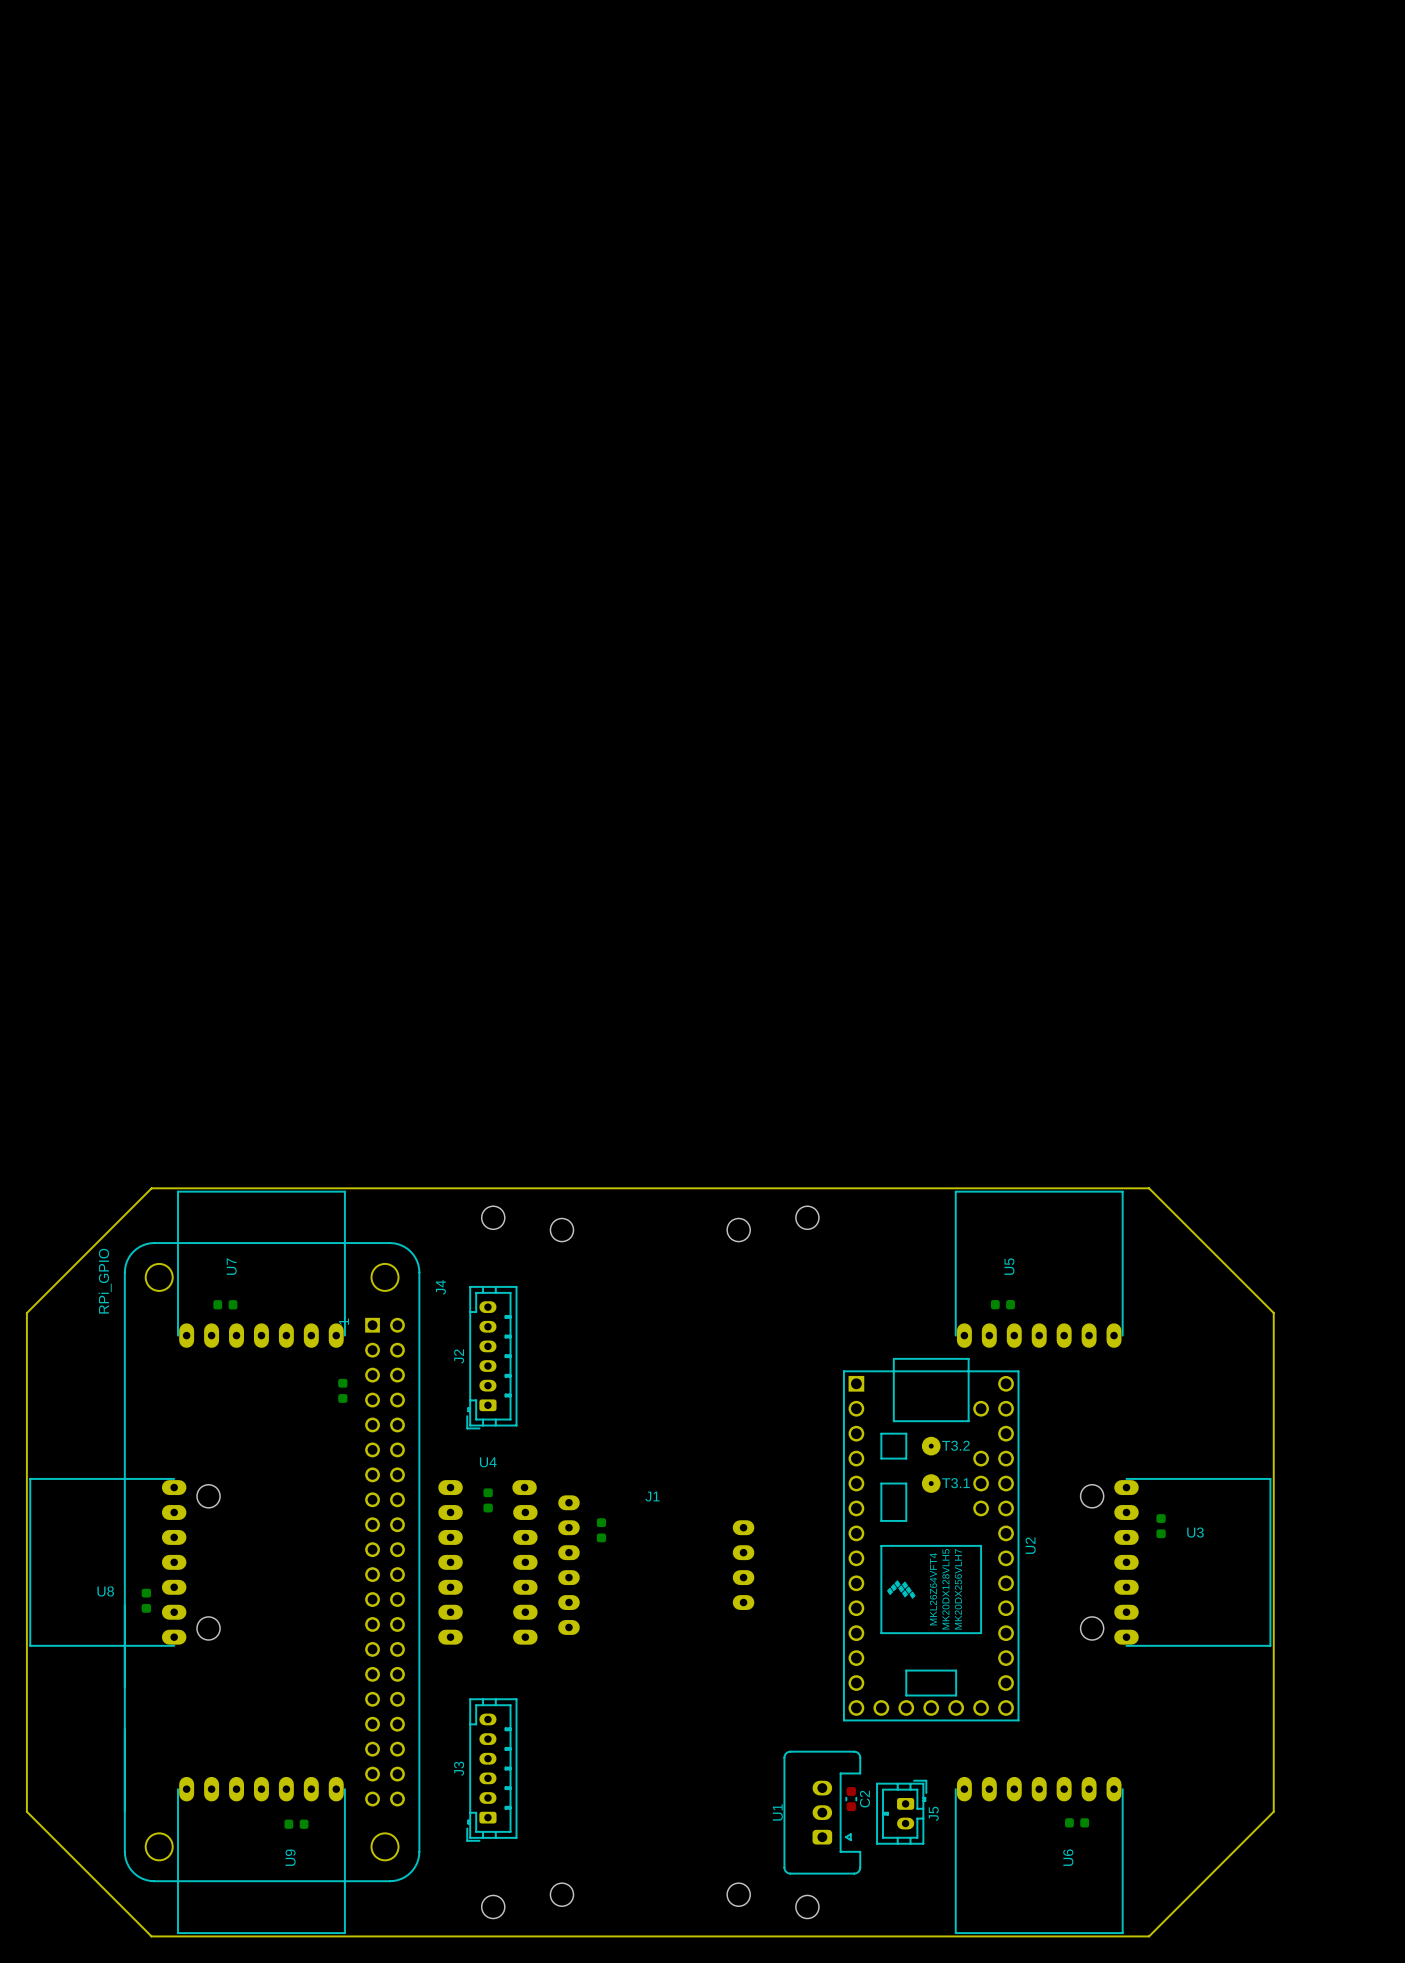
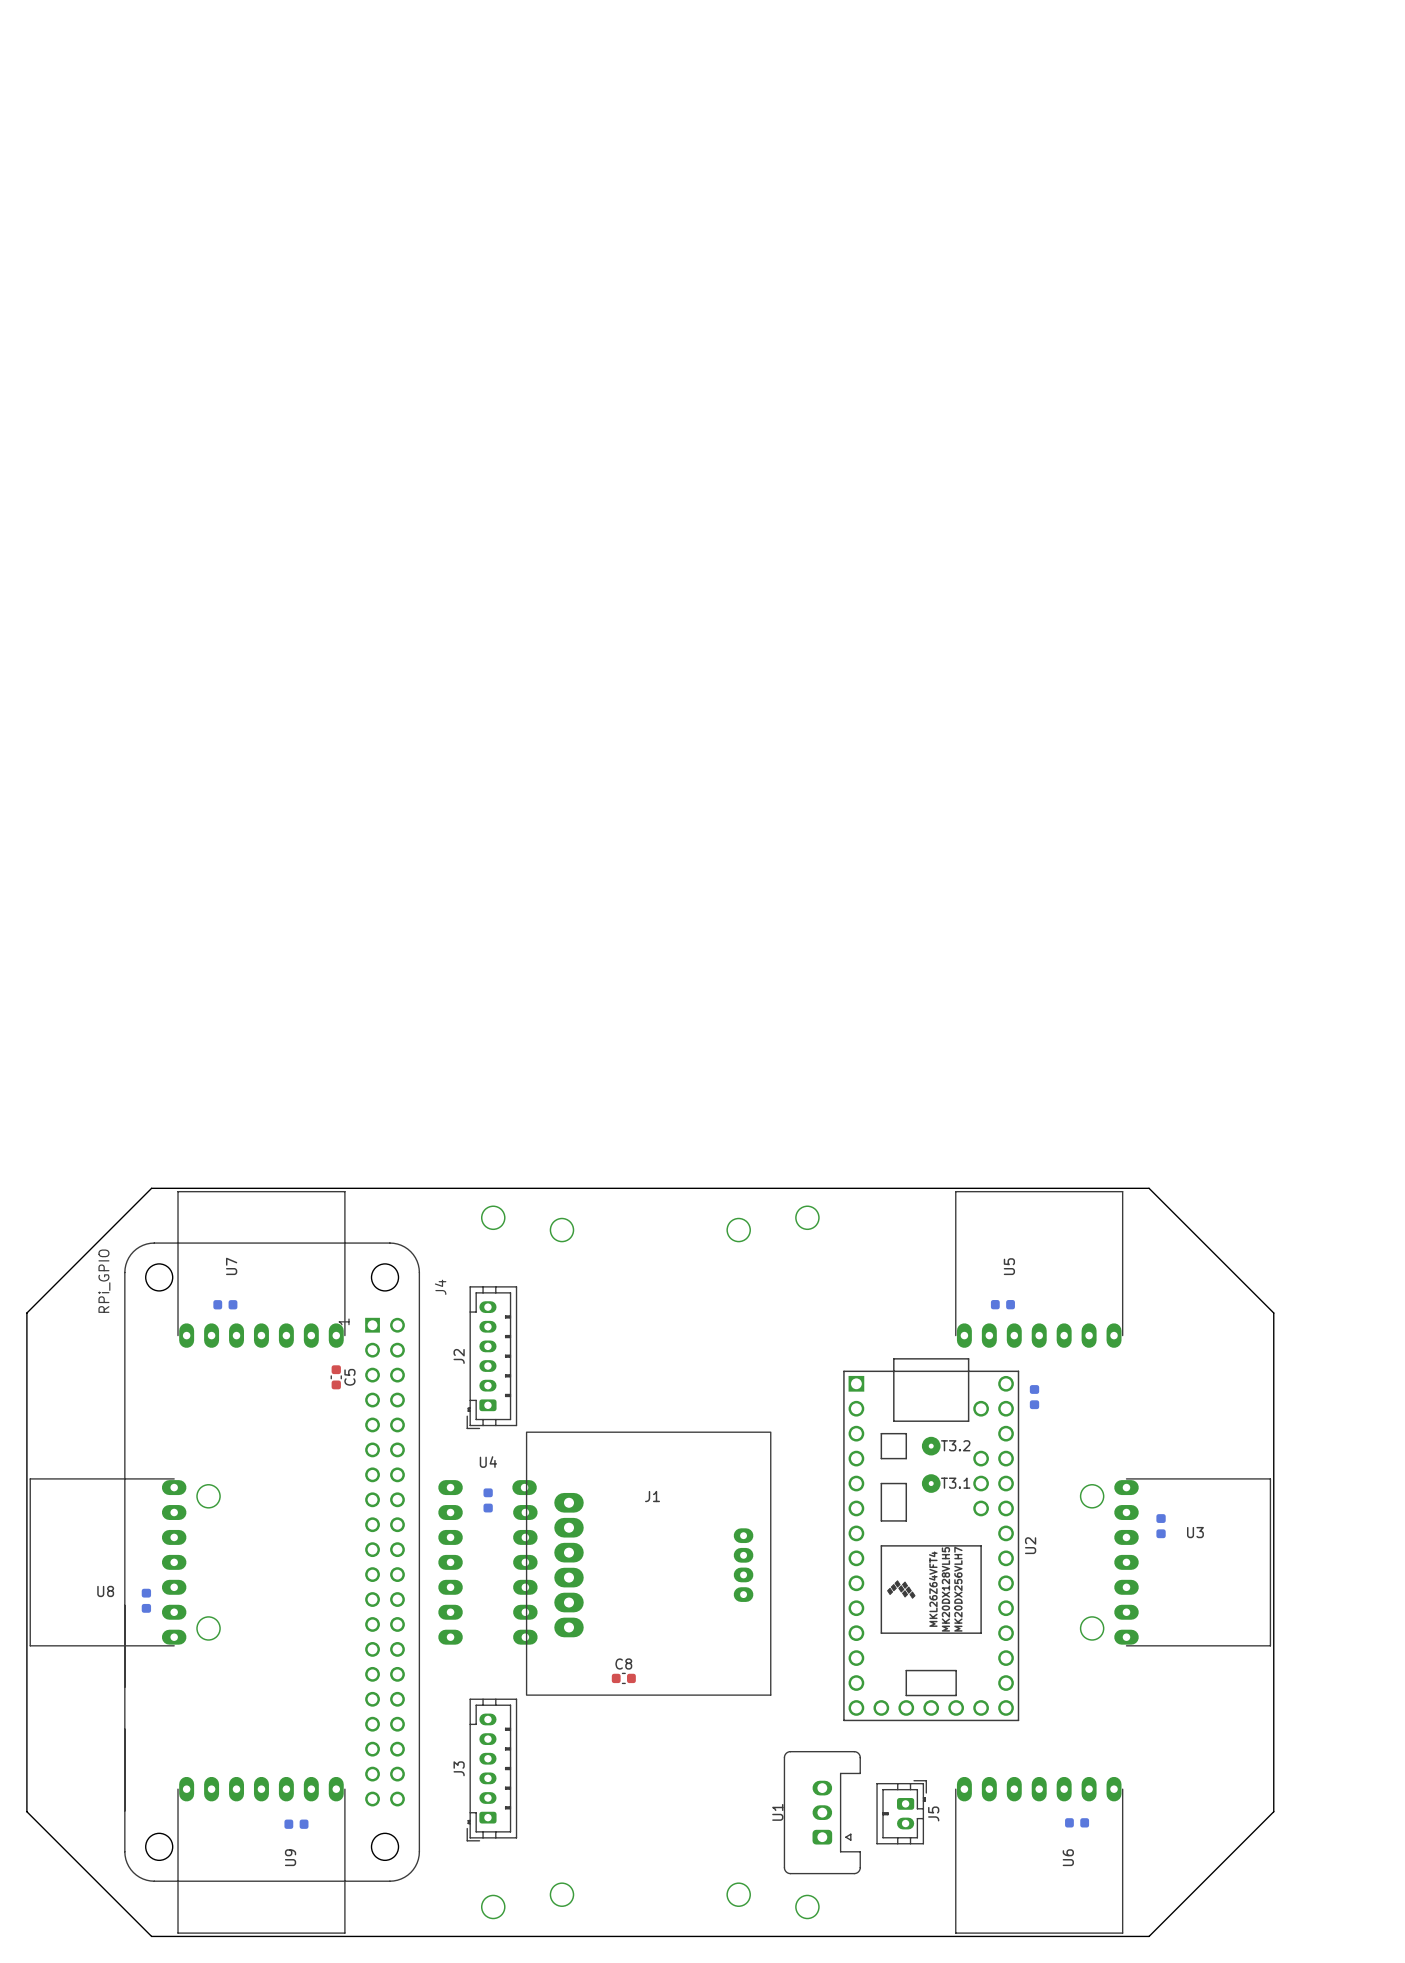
C5 side: bottom (342, 1390) -> top (336, 1377)
part: none -> (1034, 1397)
J1 footprint: [558, 1495, 755, 1635] -> [525, 1431, 772, 1696]
C8 side: bottom (601, 1530) -> top (623, 1678)
C2: (851, 1799) -> none

